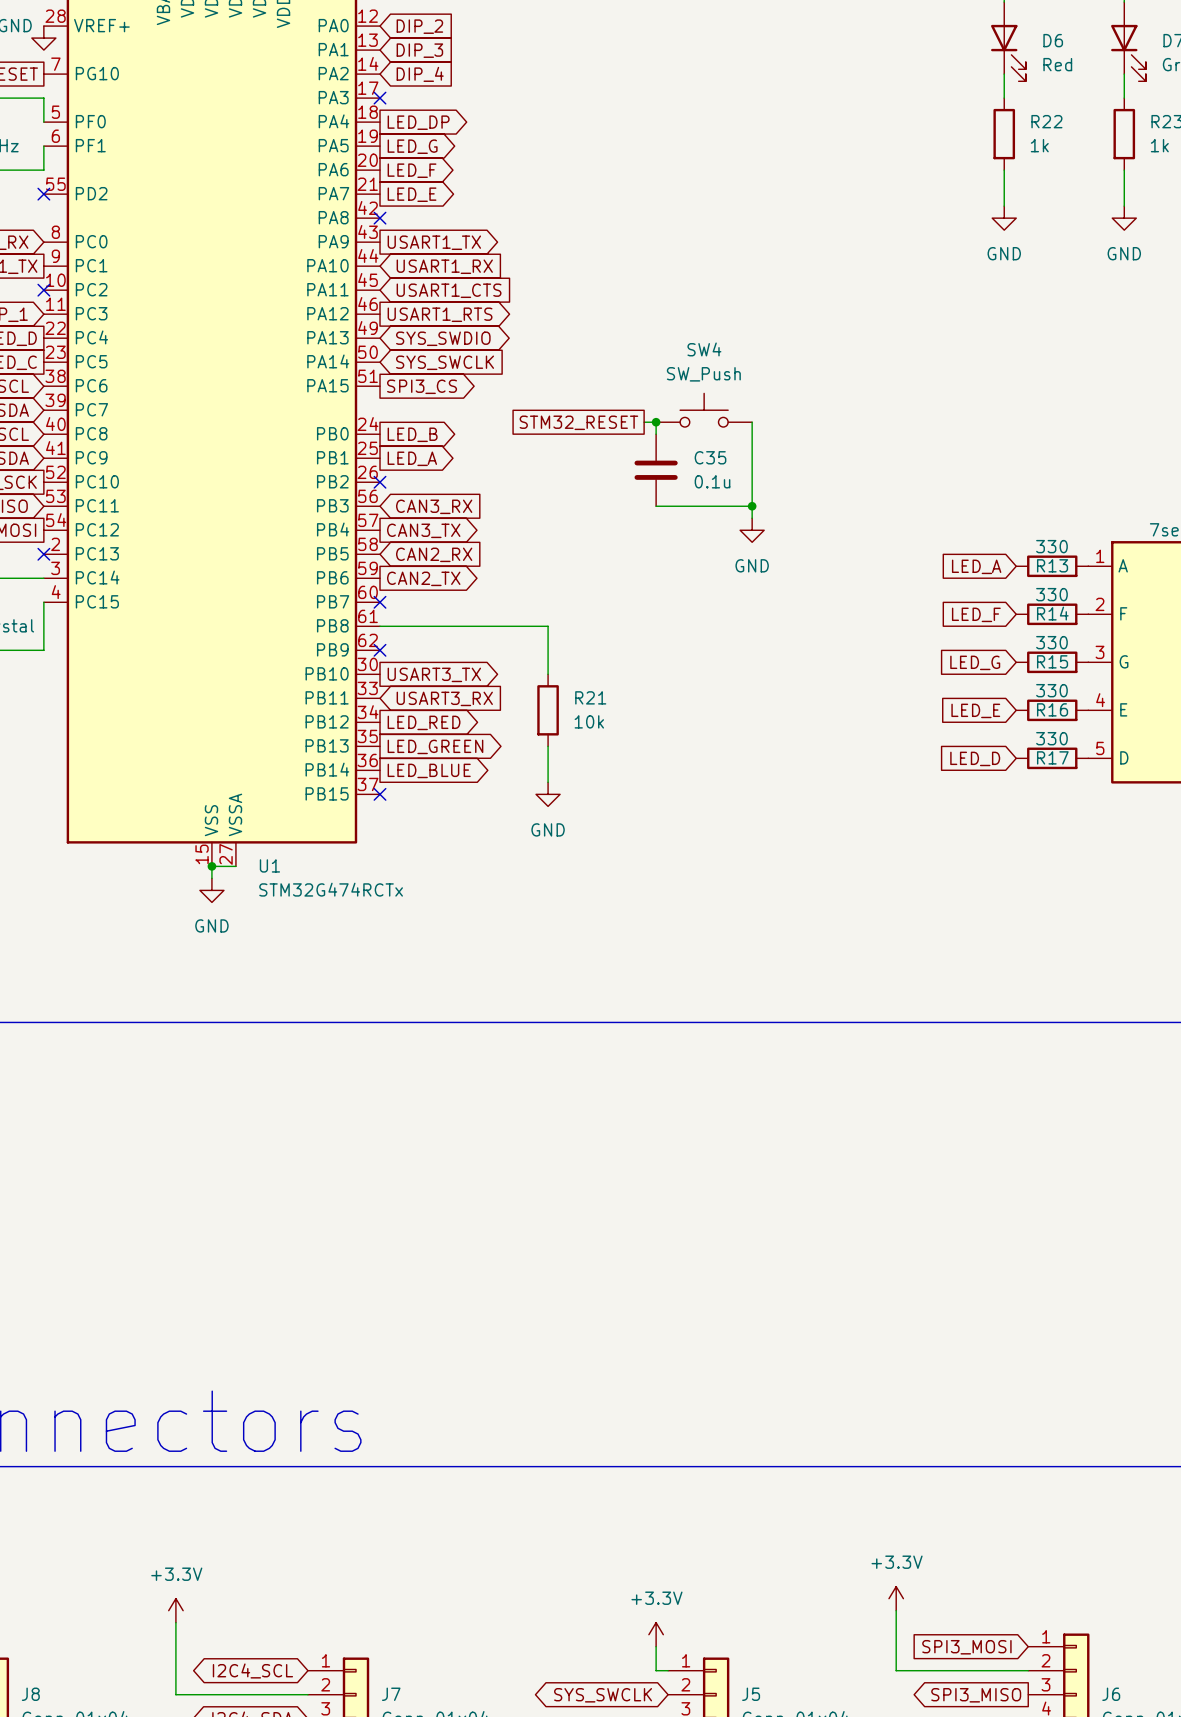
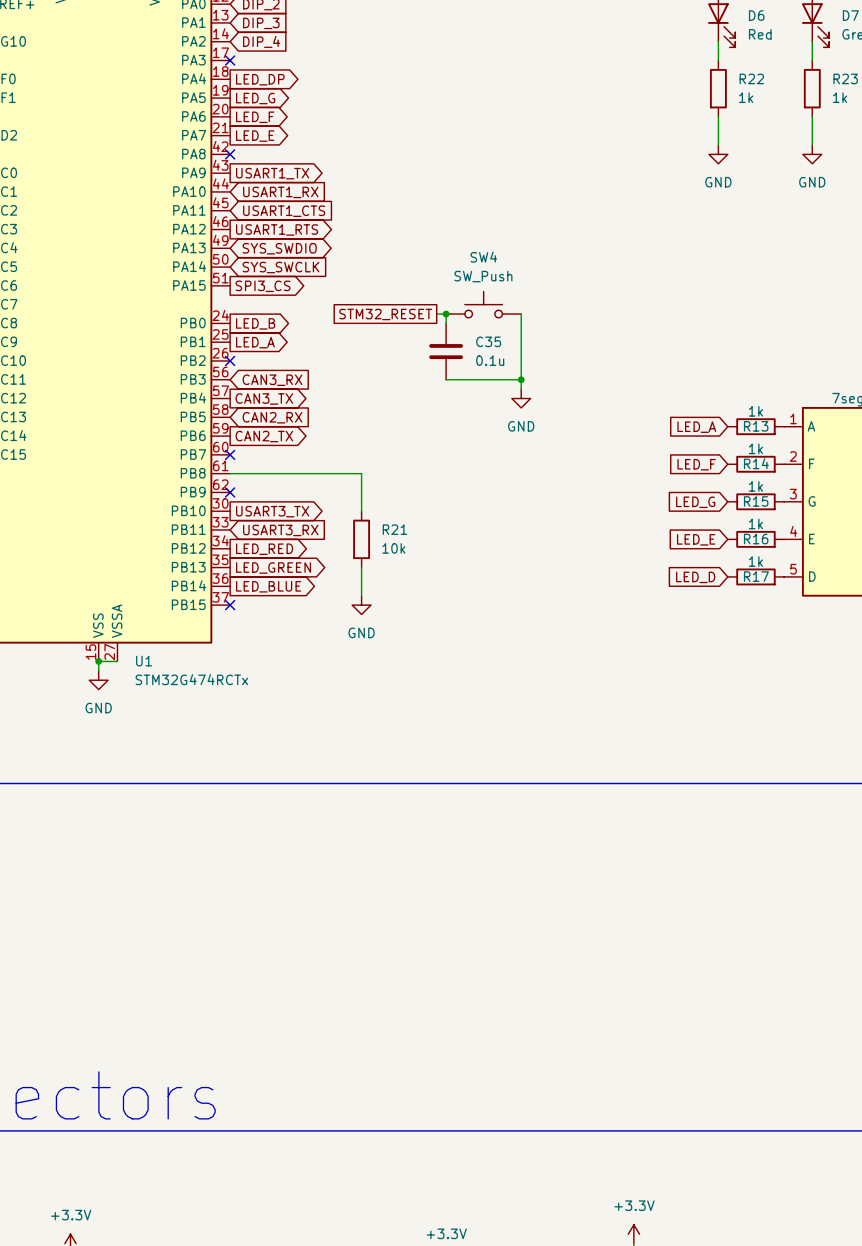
R13 value: 330 (1051, 546) -> 1k (755, 411)
R14 value: 330 (1051, 594) -> 1k (755, 448)
R15 value: 330 (1051, 642) -> 1k (755, 486)
R16 value: 330 (1051, 690) -> 1k (755, 524)
R17 value: 330 (1051, 738) -> 1k (755, 561)

